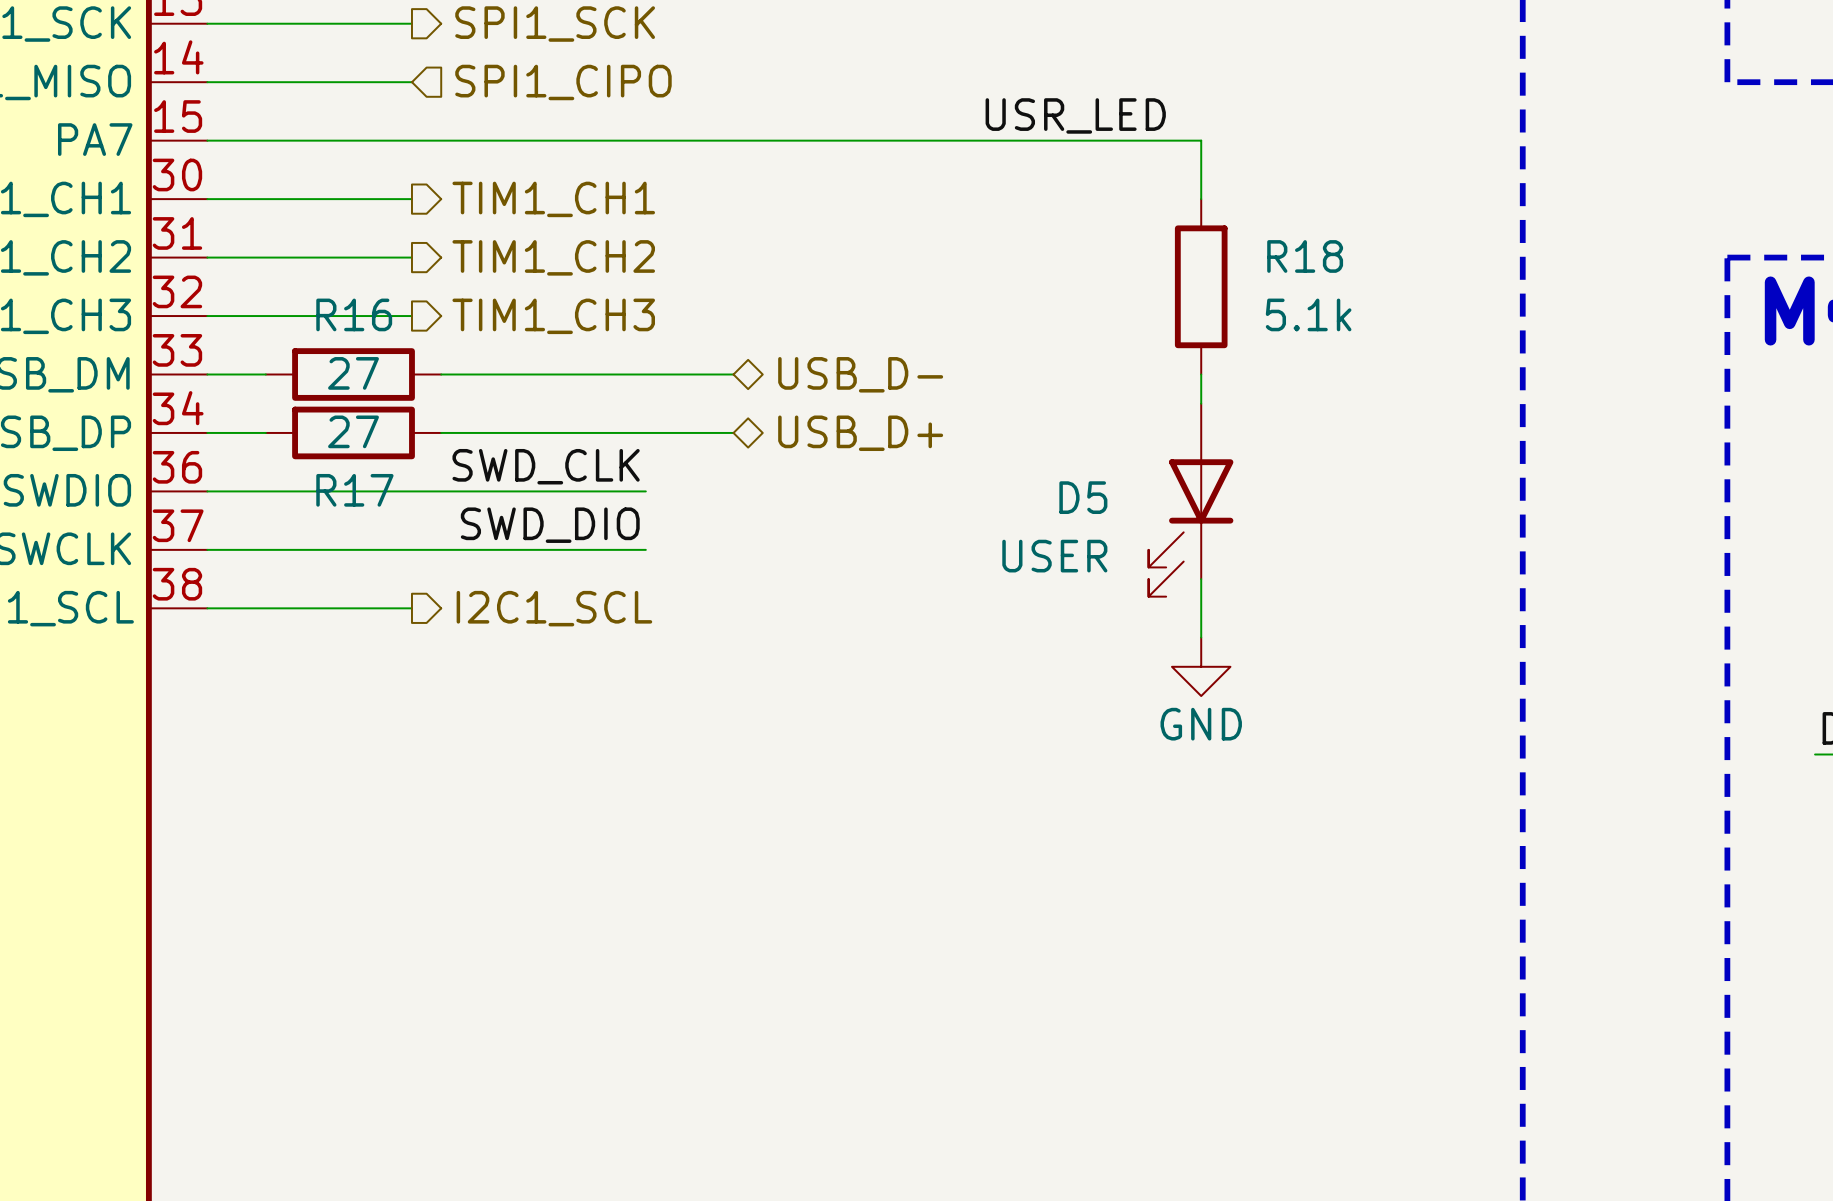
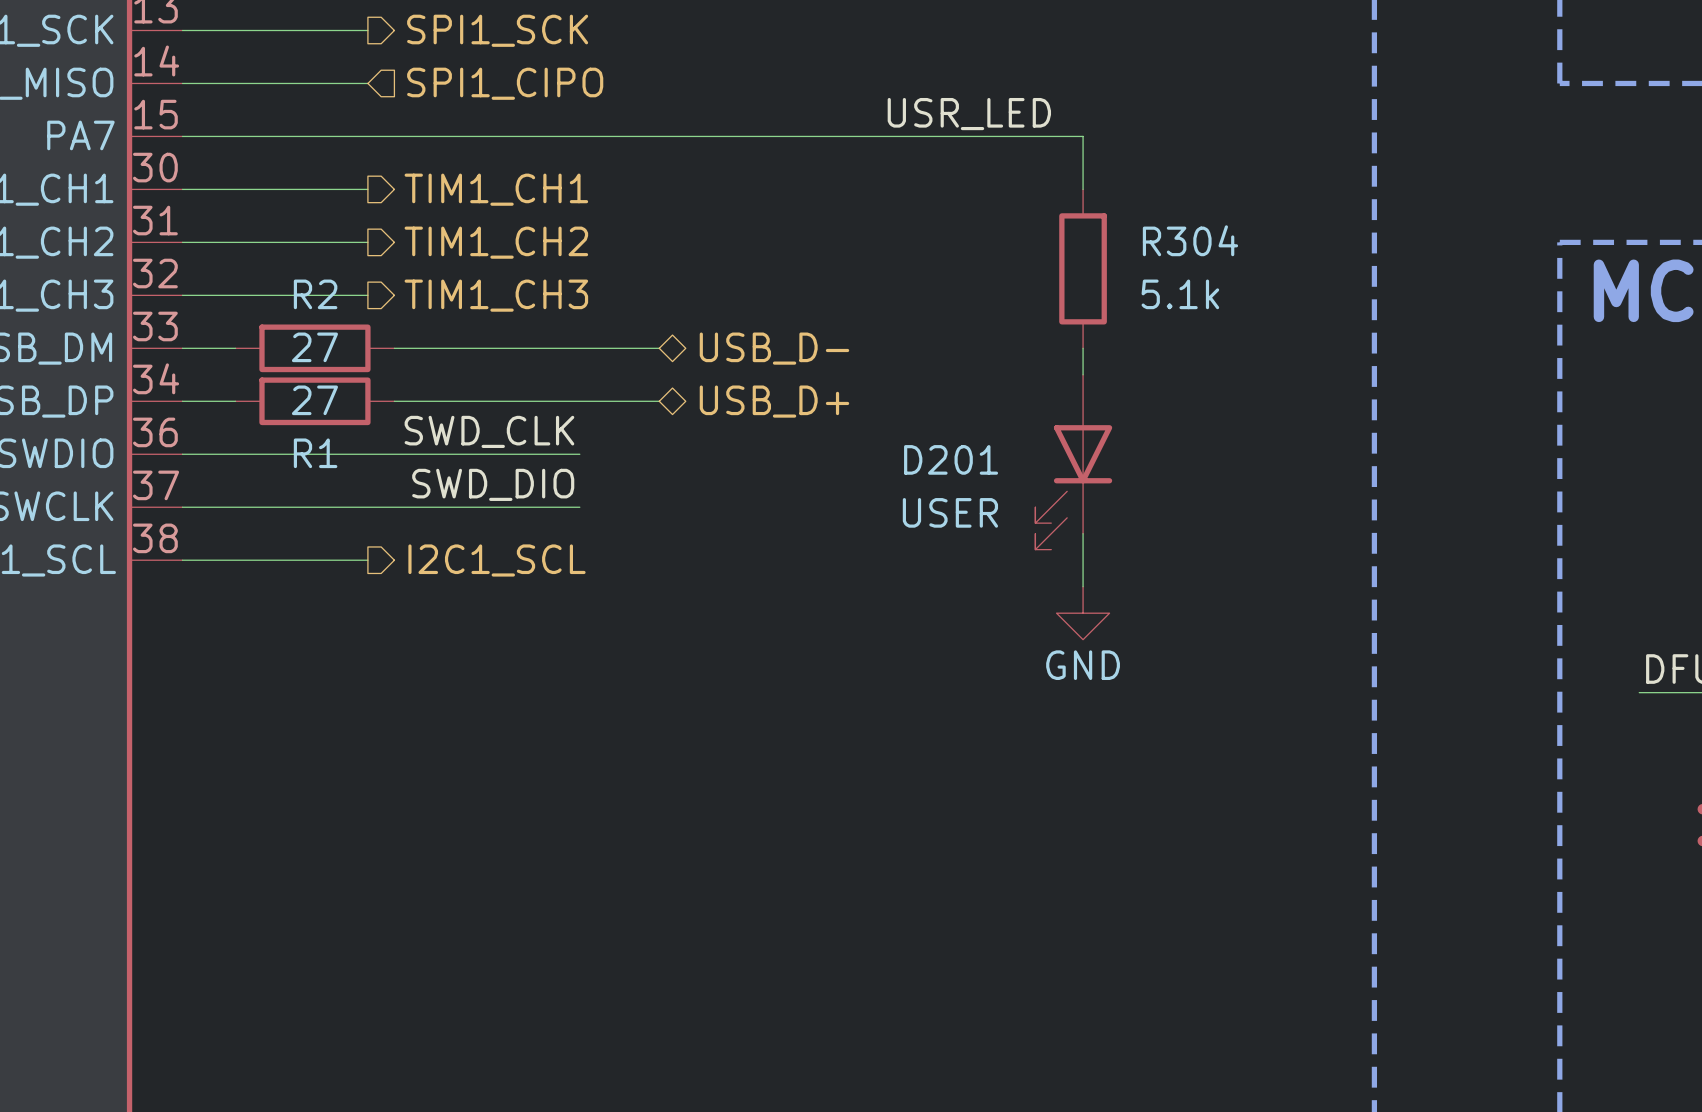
R18 name: R18 (1305, 256) -> R304 (1190, 240)
R16 name: R16 (354, 314) -> R2 (315, 294)
R17 name: R17 (354, 490) -> R1 (315, 453)
D5 name: D5 (1083, 497) -> D201 (951, 459)

